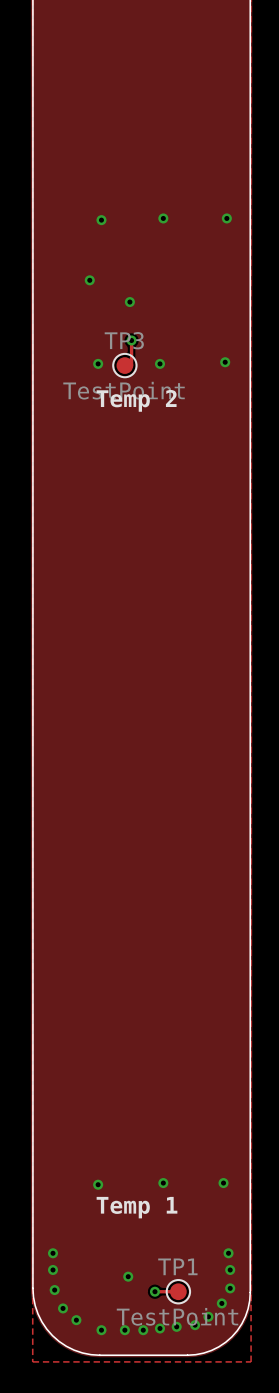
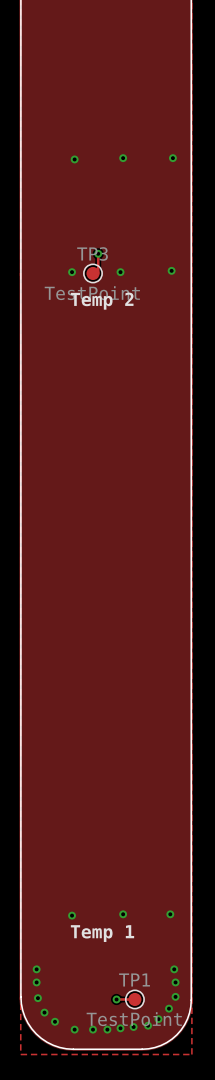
via: (89, 280) -> none
via: (129, 302) -> none
via: (128, 1276) -> none

